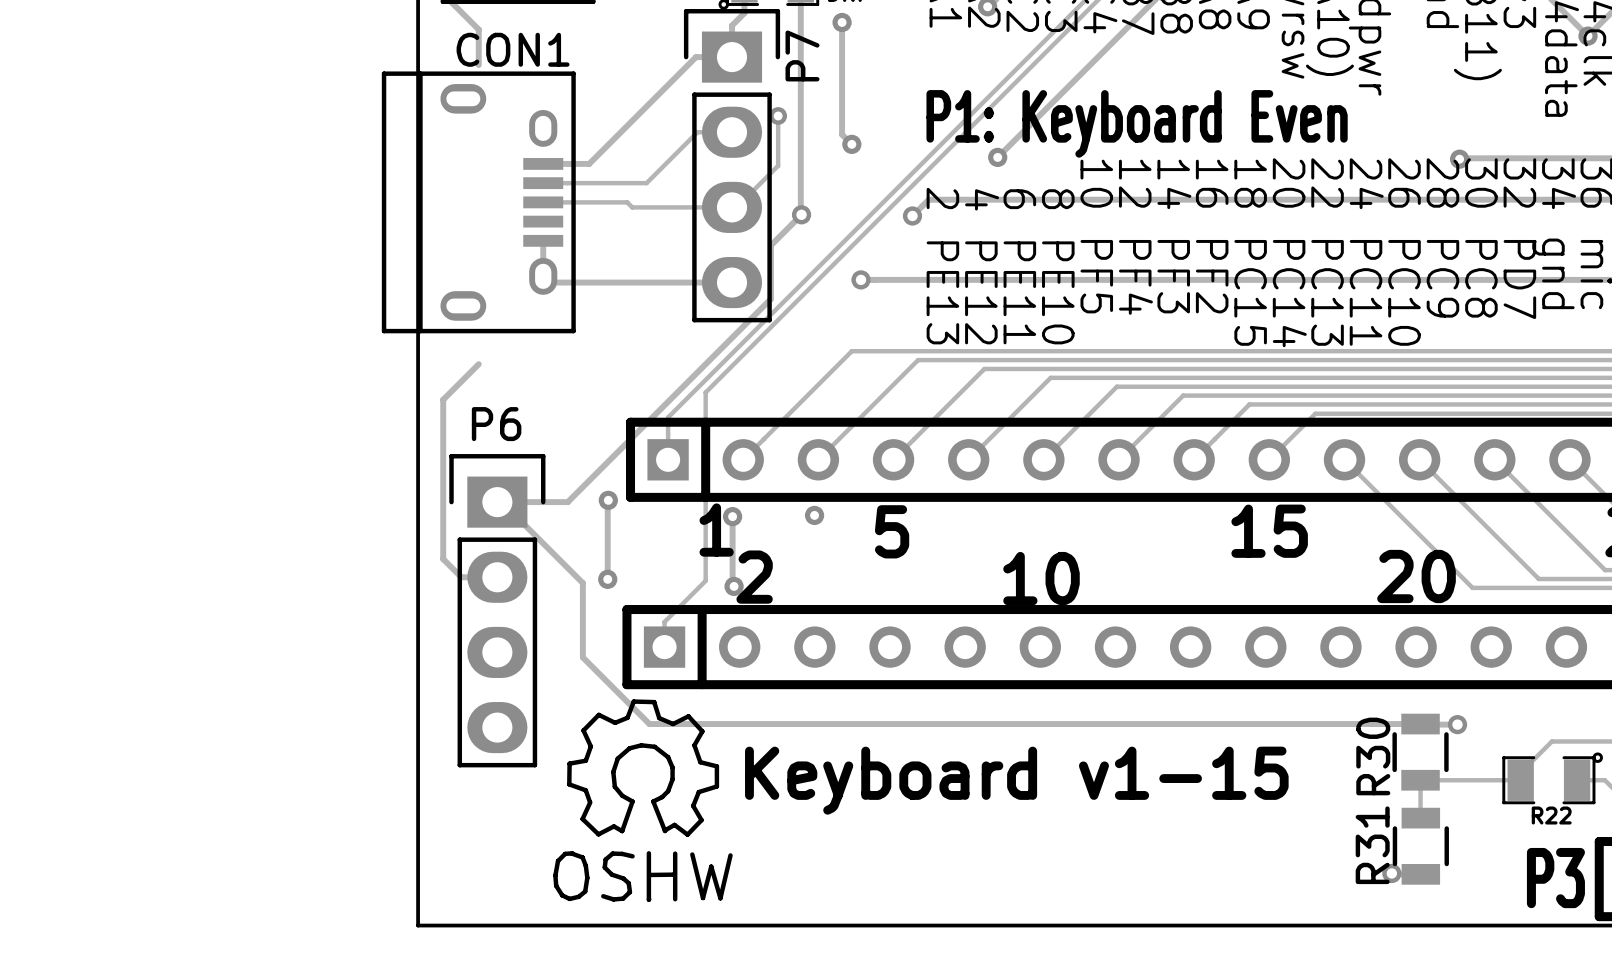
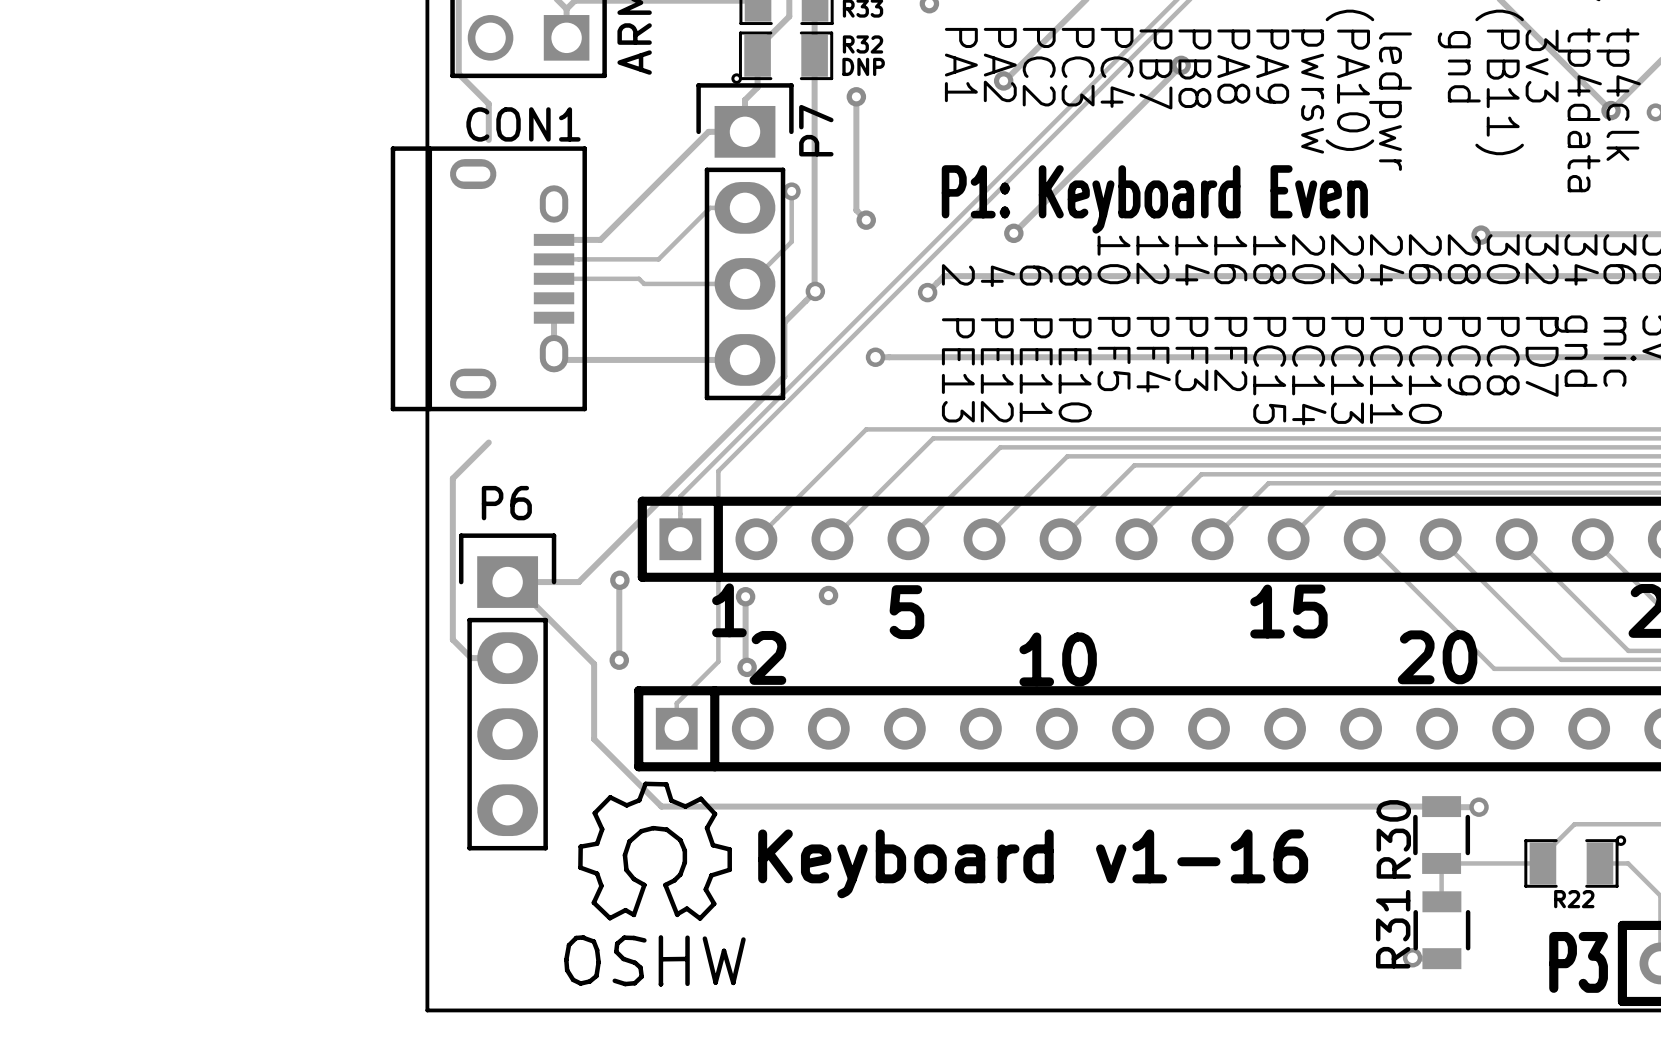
text: Keyboard v1-15 (1016, 780) -> Keyboard v1-16 (1033, 863)

